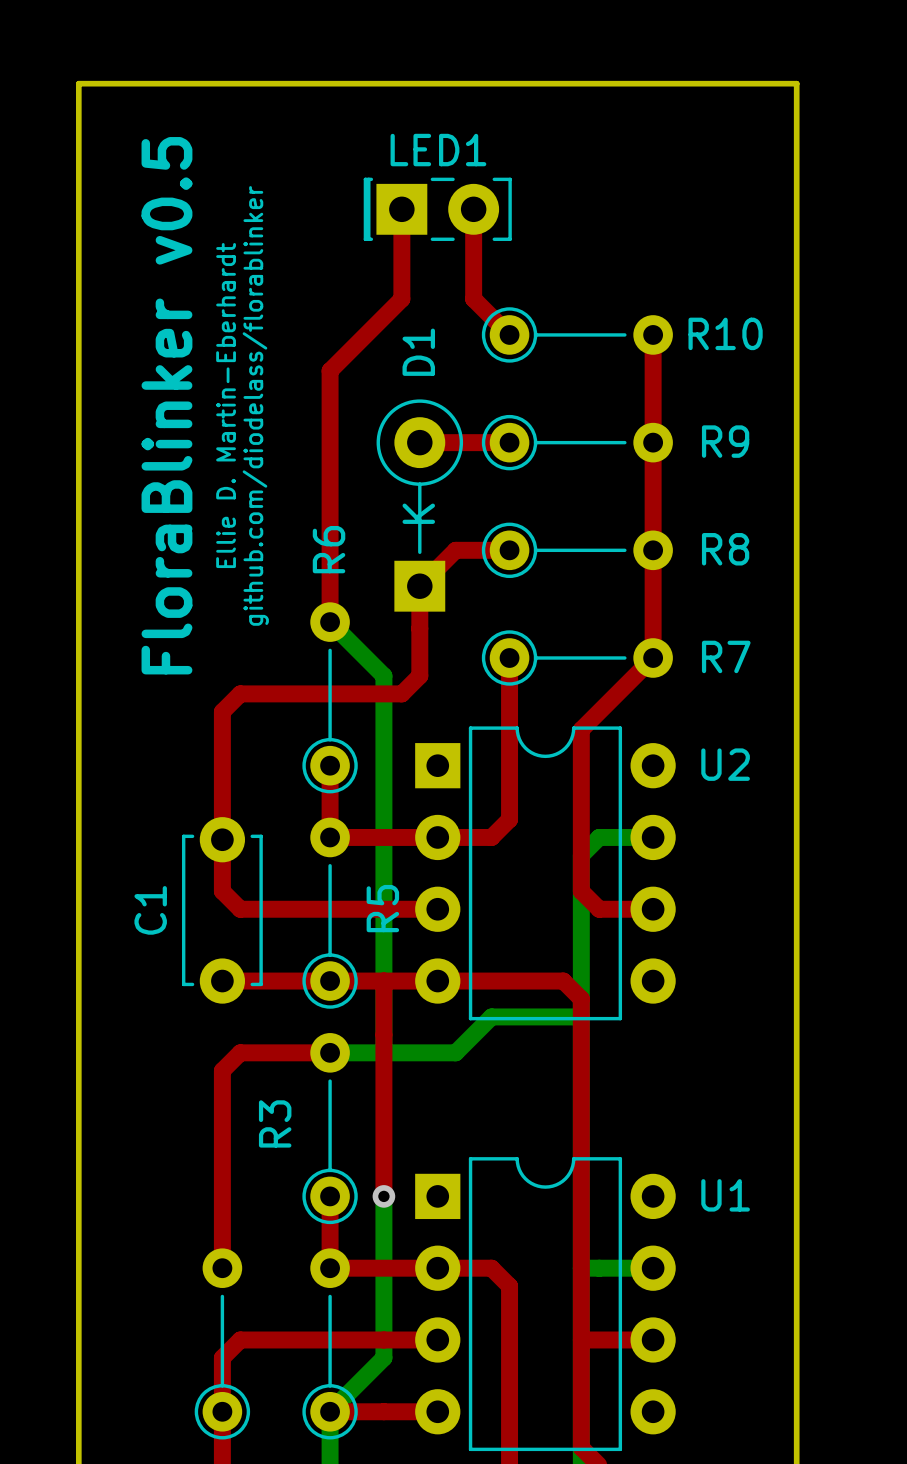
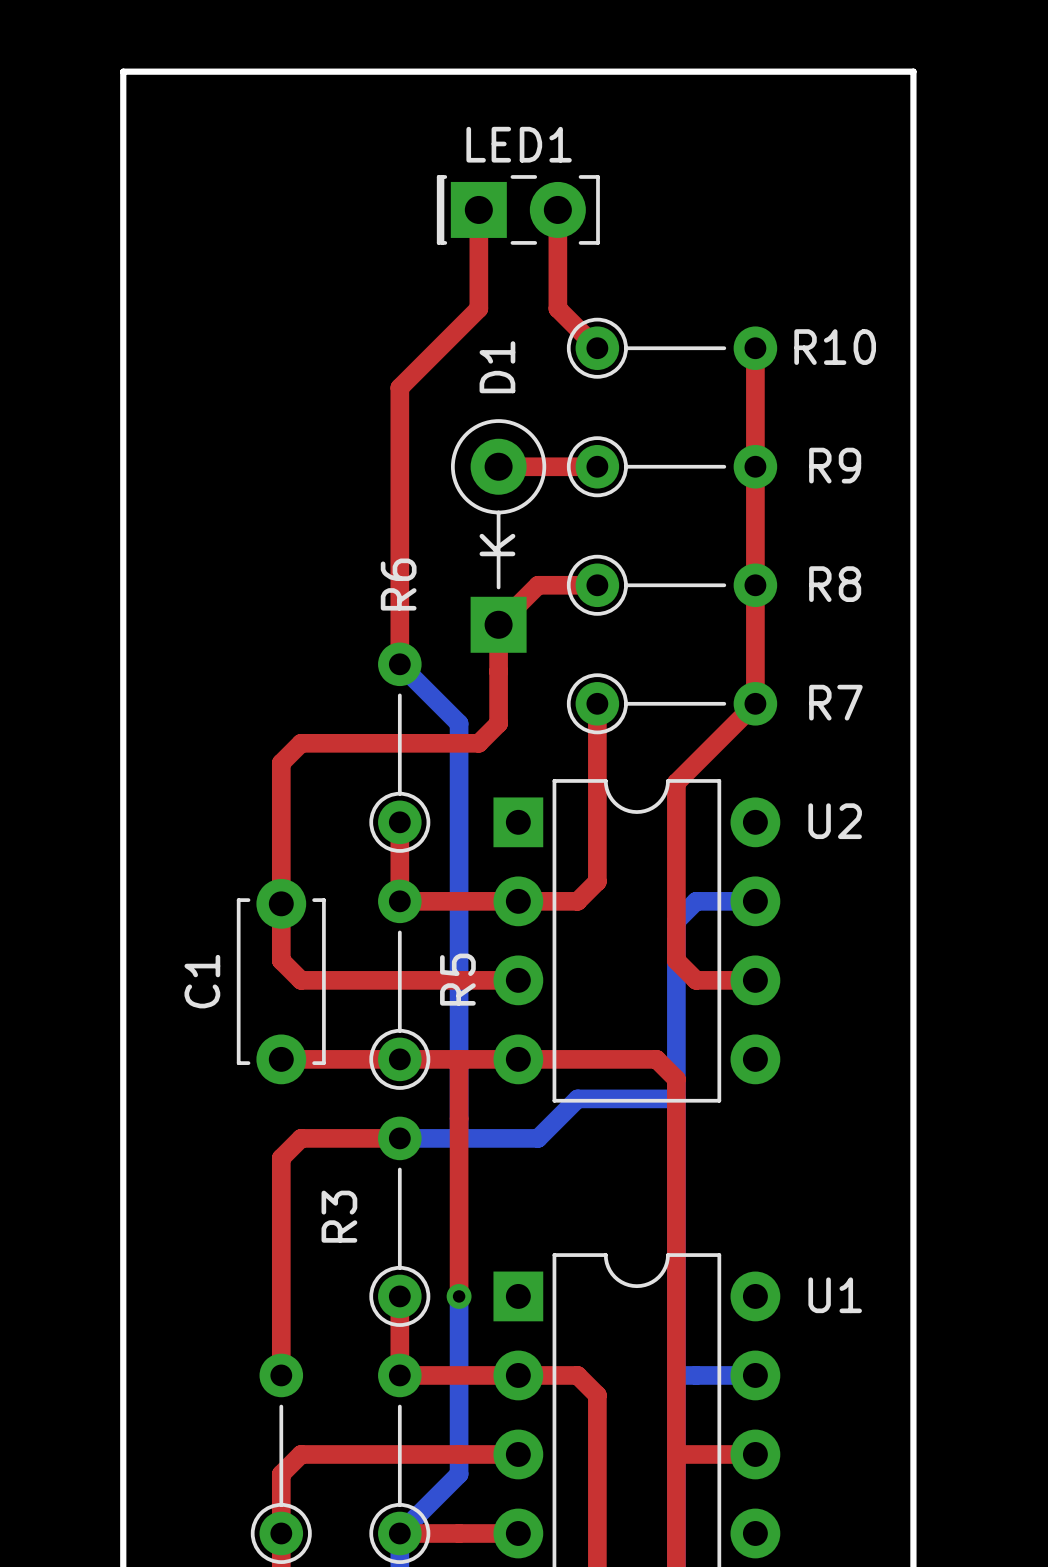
text: FloraBlinker v0.5 (166, 405) -> none
text: Ellie D. Martin-Eberhardt (226, 405) -> none
text: github.com/diodelass/florablinker (255, 405) -> none

